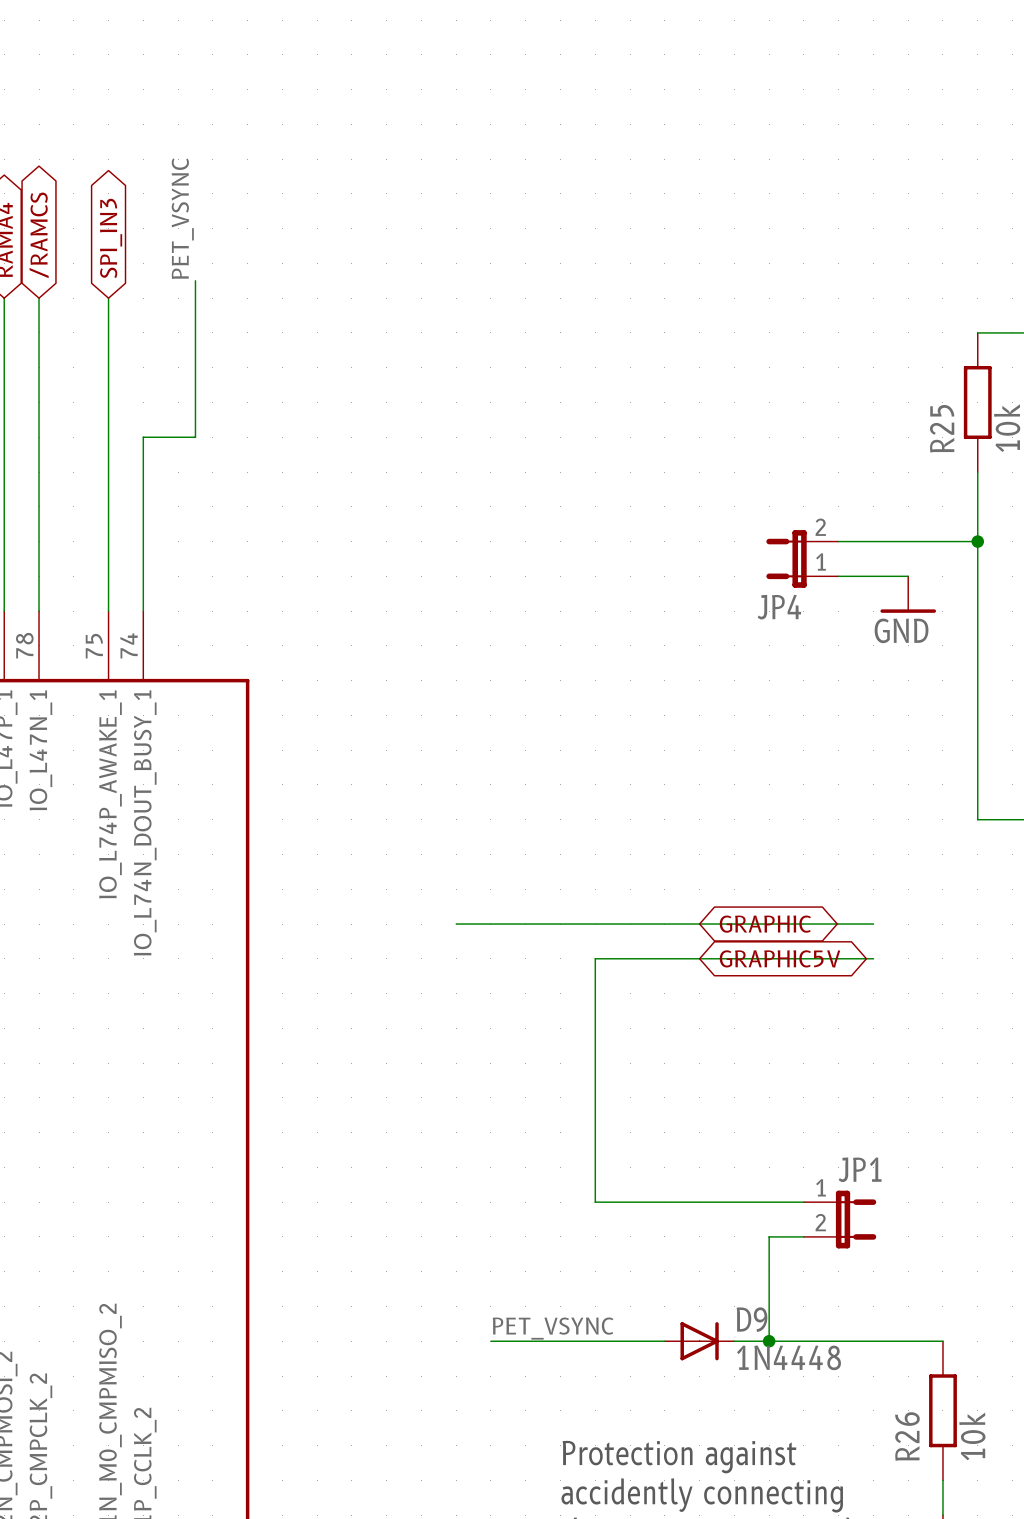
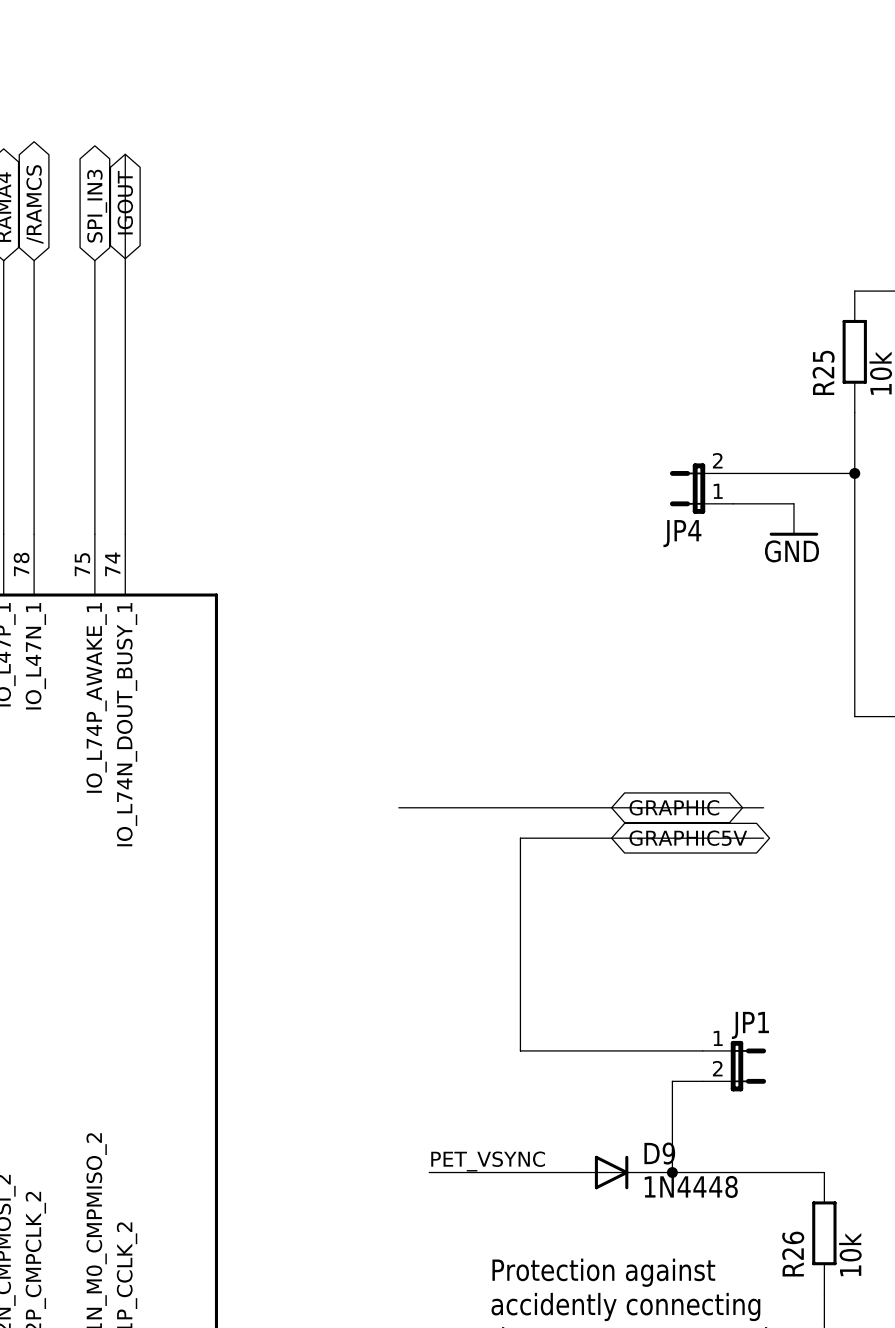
label: PET_VSYNC (182, 218) -> none
global label: none -> IGOUT (125, 202)
wire: (195, 280) (195, 437) (143, 437) -> (125, 154) (125, 382)

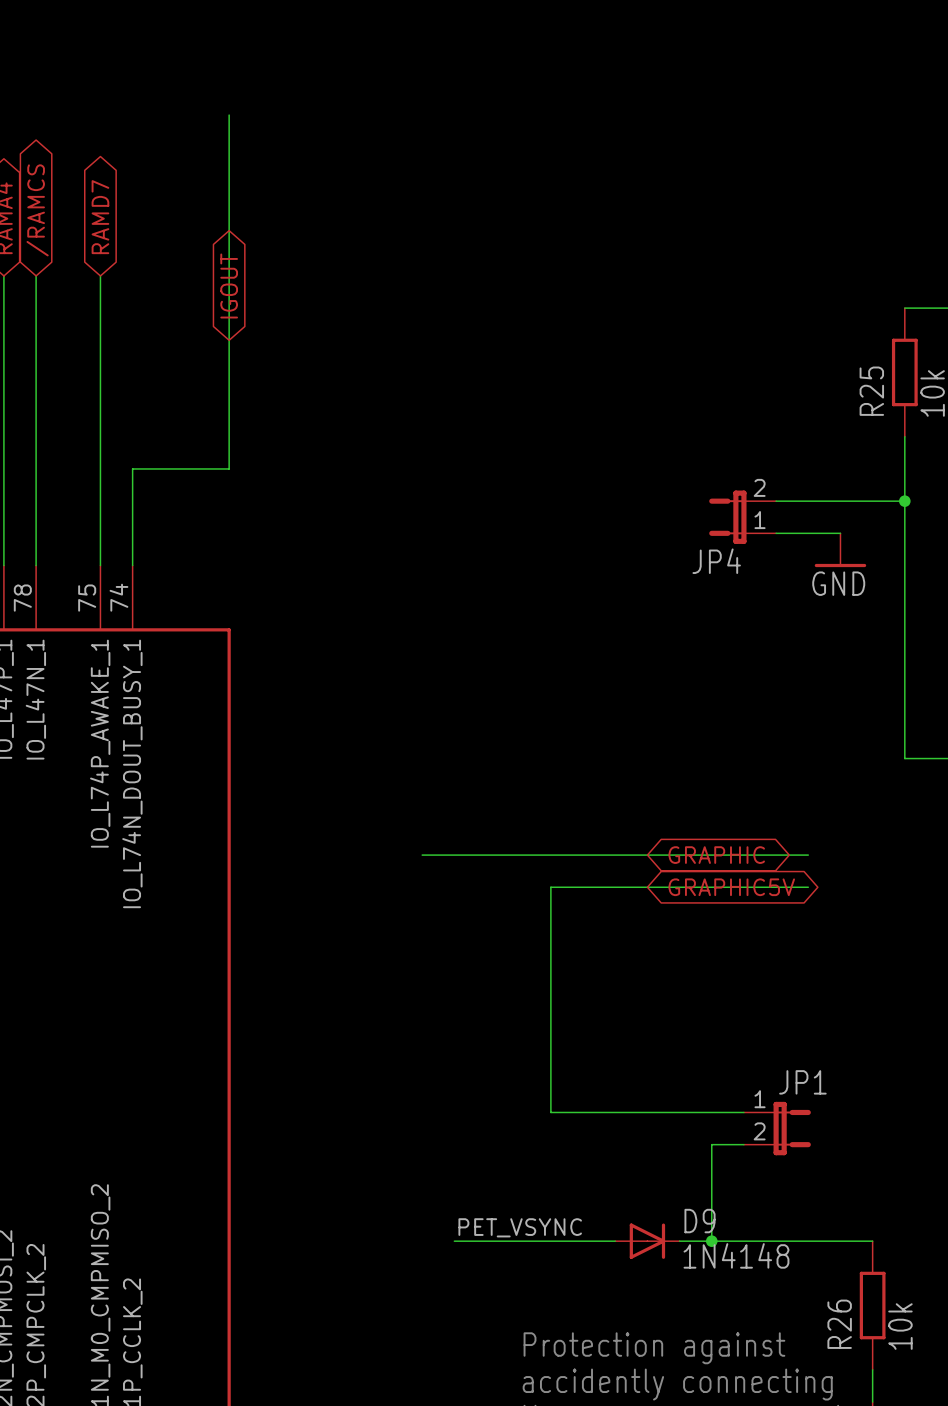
wire: (125, 154) (125, 443) -> (229, 115) (229, 468) (132, 468)
global label rotation: 0° (125, 202) -> 180° (229, 285)
global label: SPI_IN3 (97, 206) -> RAMD7 (100, 217)
D9 value: 1N4448 (691, 1186) -> 1N4148 (736, 1255)

